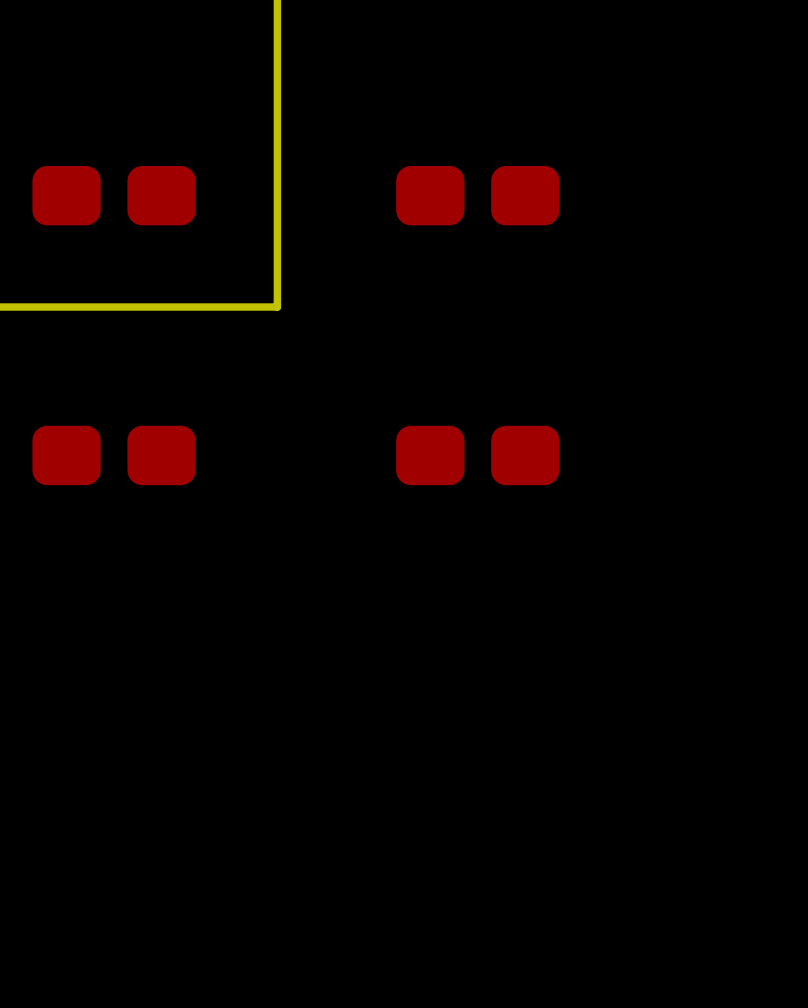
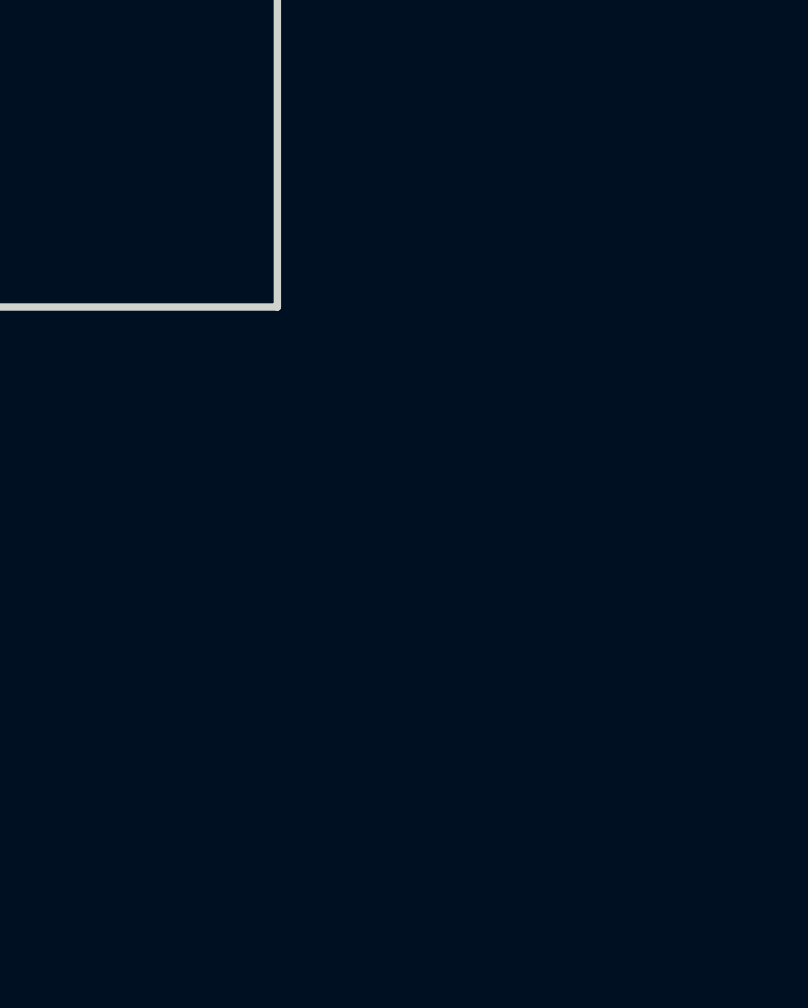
part: (114, 195) -> none
part: (477, 195) -> none
part: (114, 455) -> none
part: (477, 455) -> none

